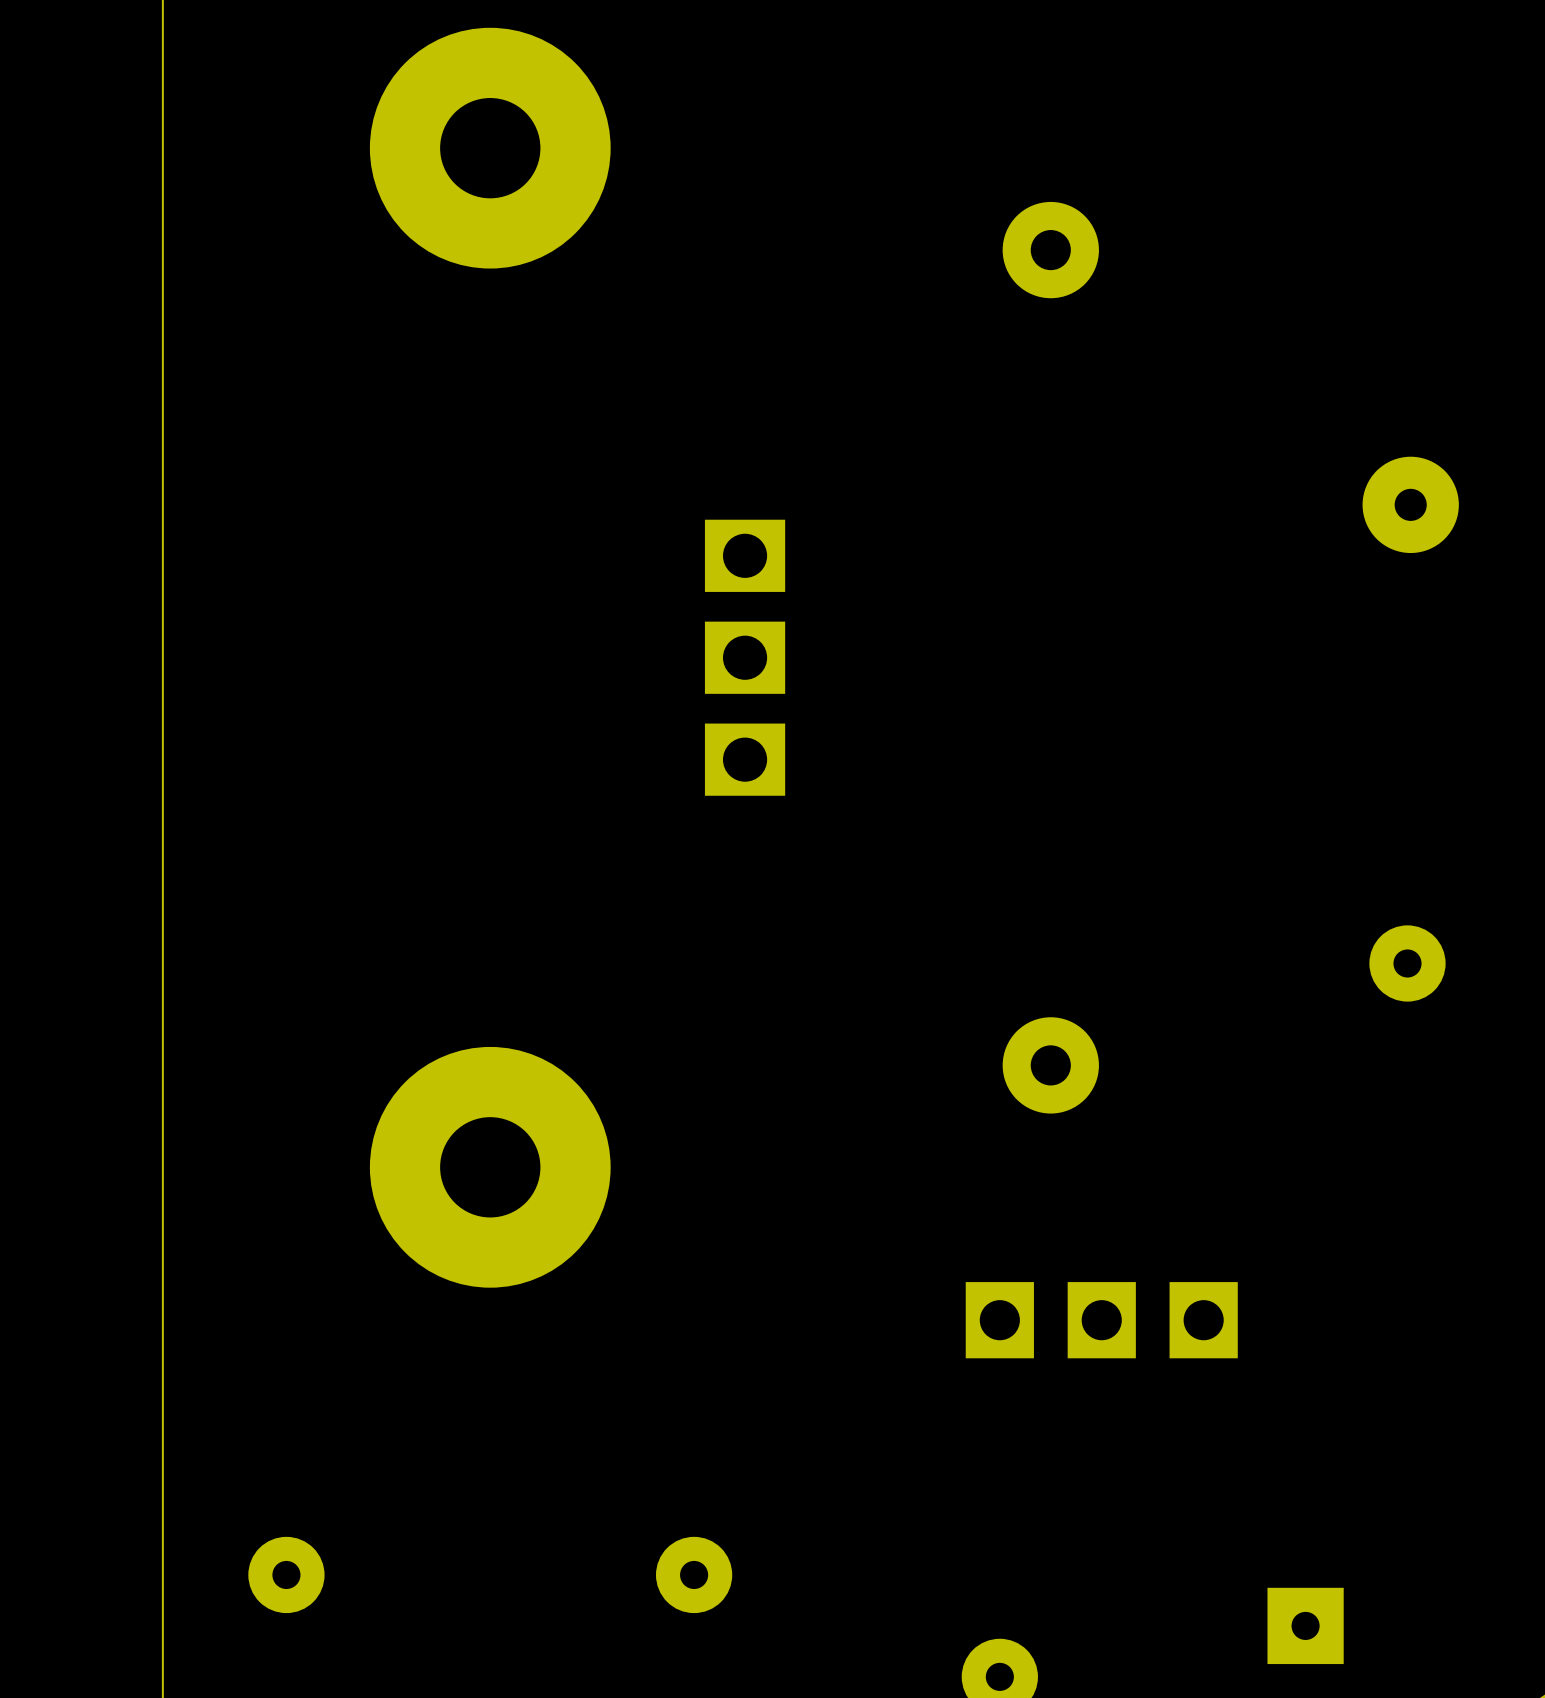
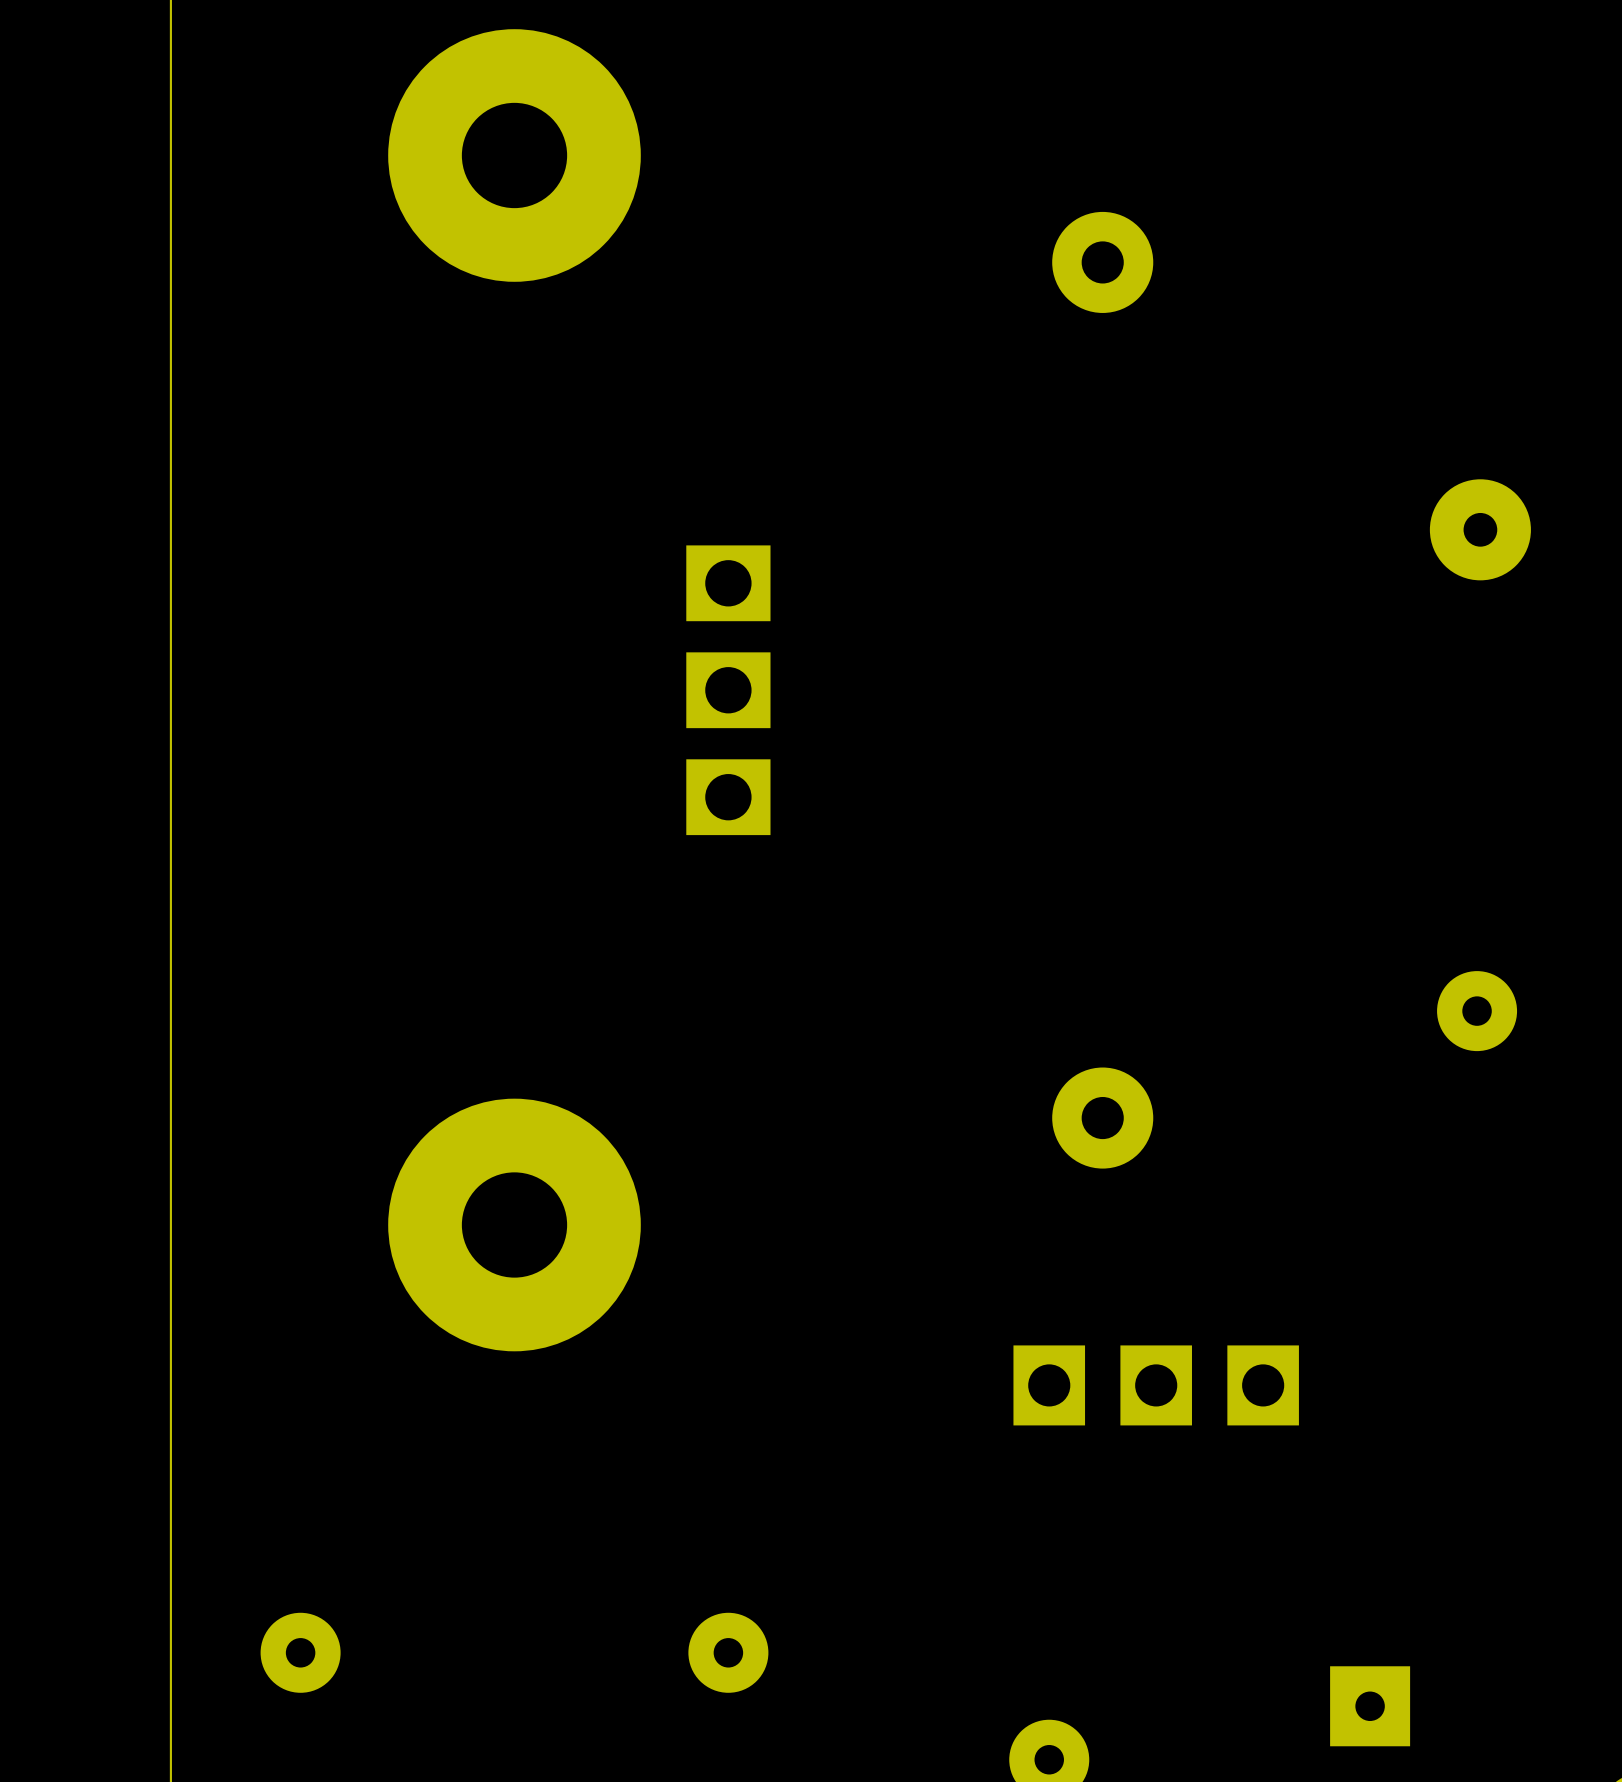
part position: (745, 657) -> (728, 690)

